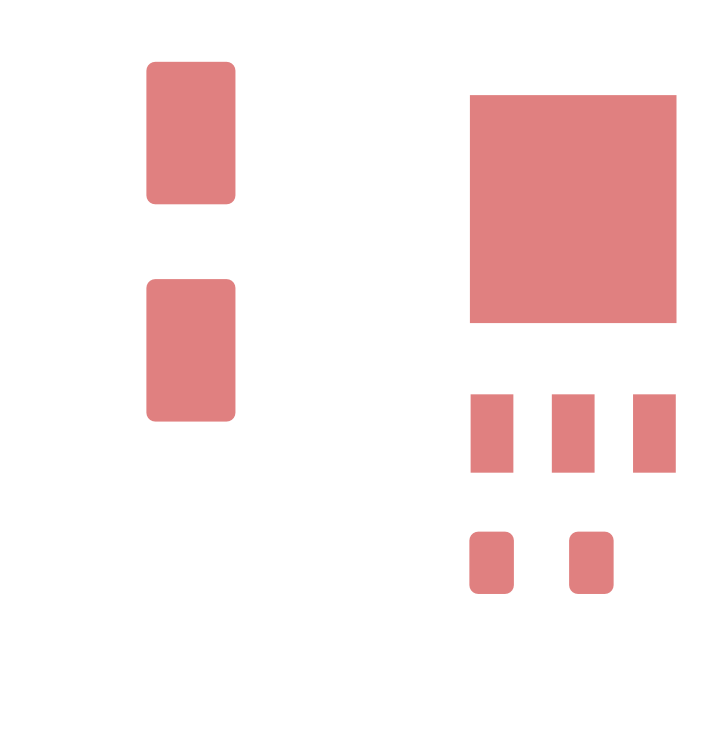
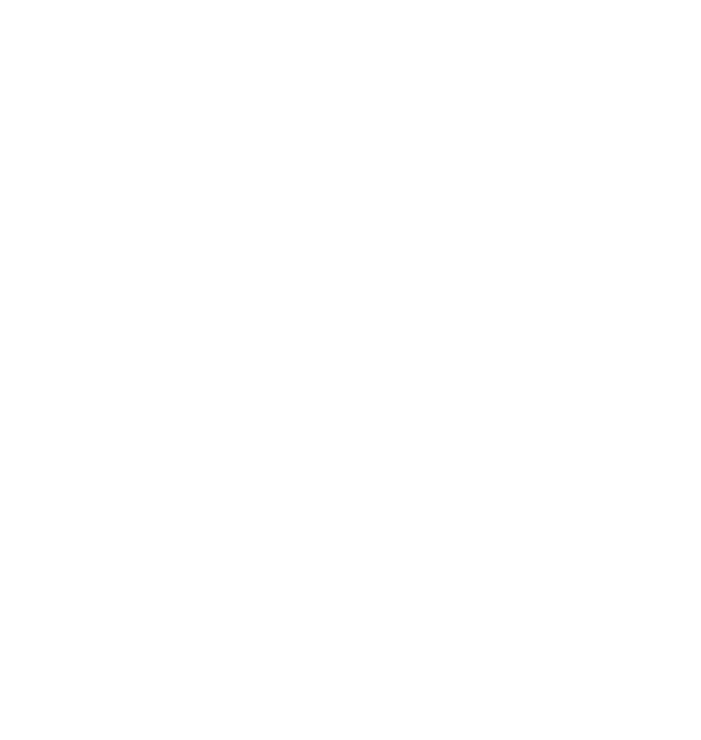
part: (190, 241) -> none
part: (573, 283) -> none
part: (541, 562) -> none

